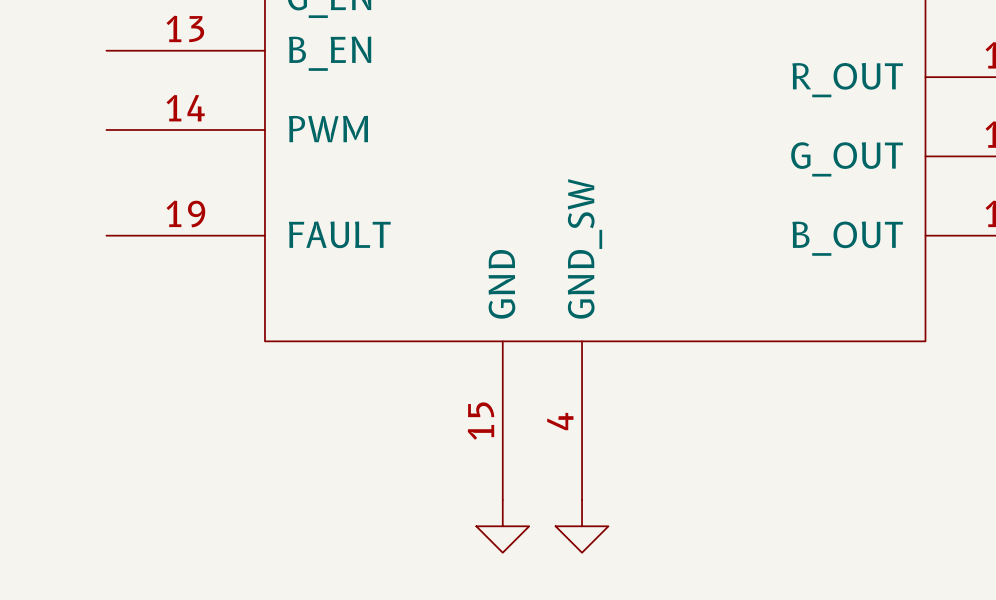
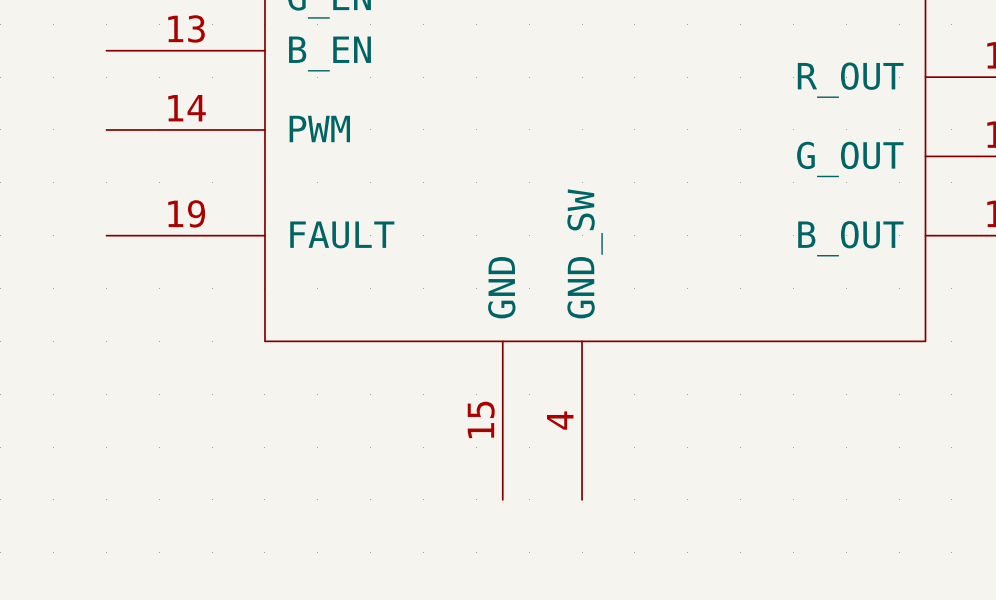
power symbol: (502, 526) -> none
power symbol: (582, 526) -> none

